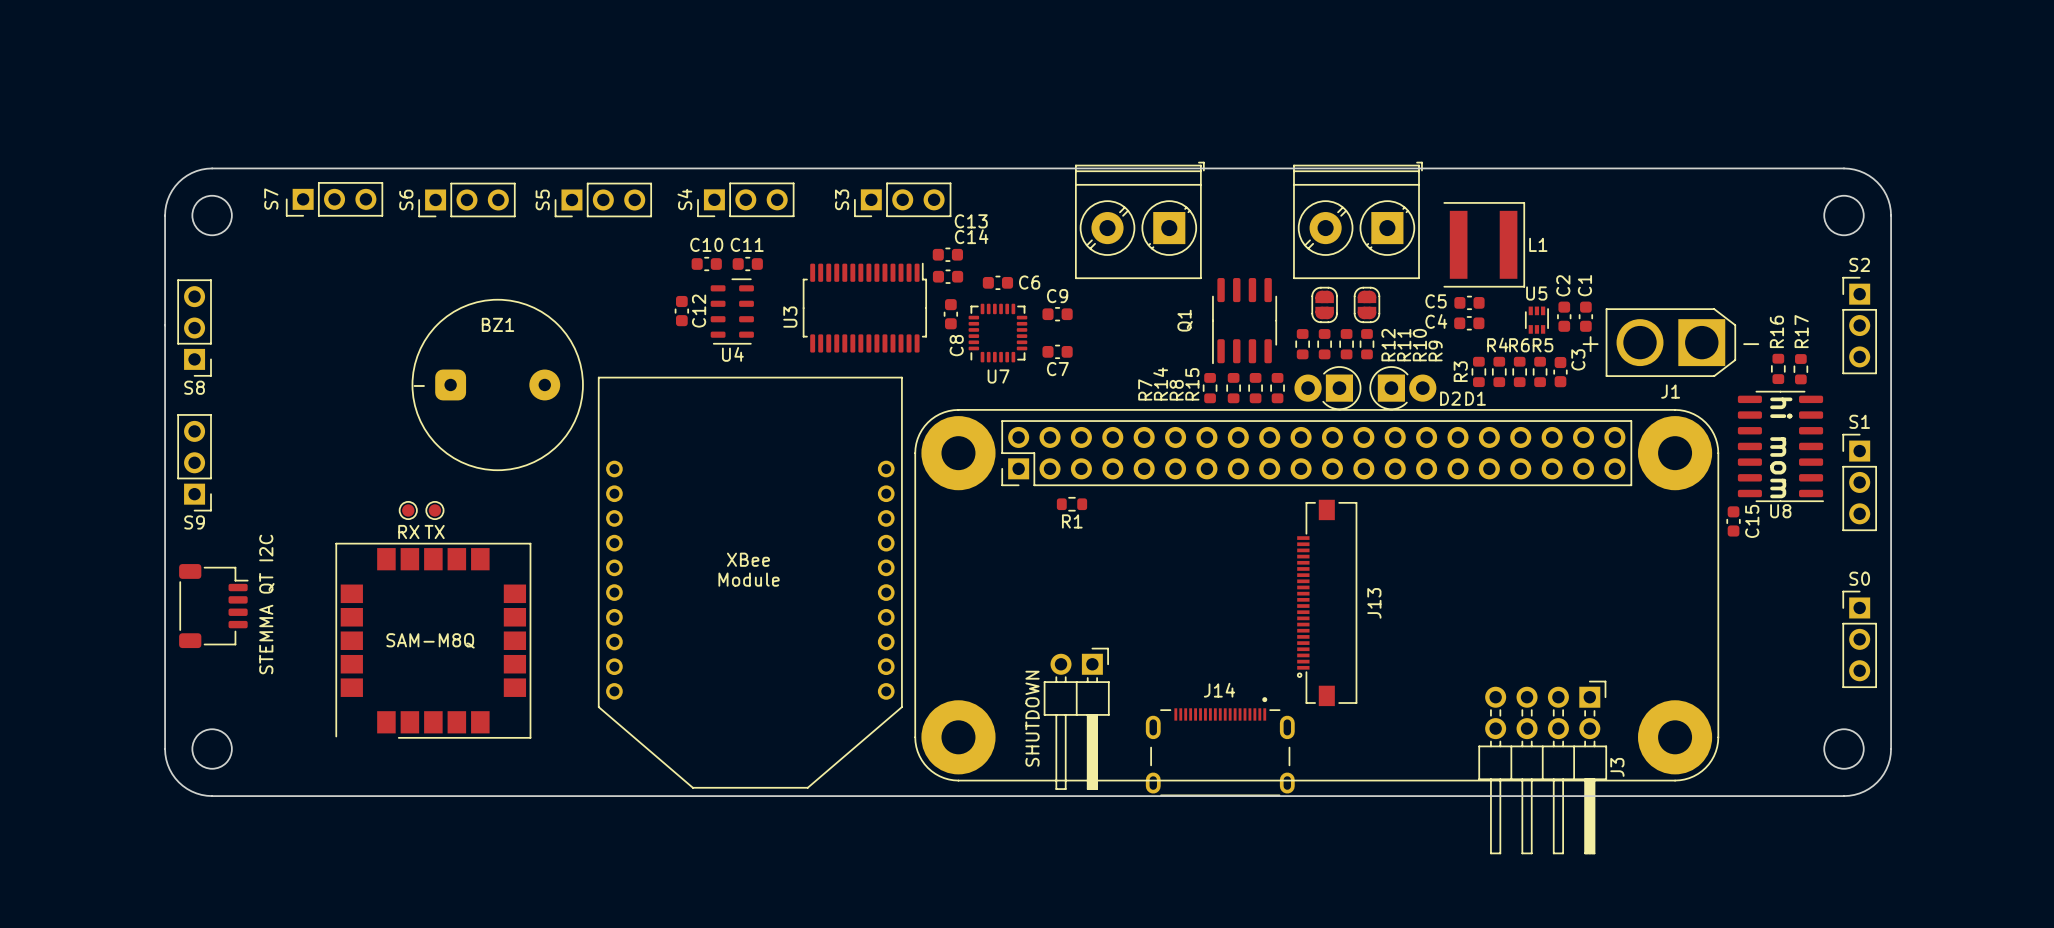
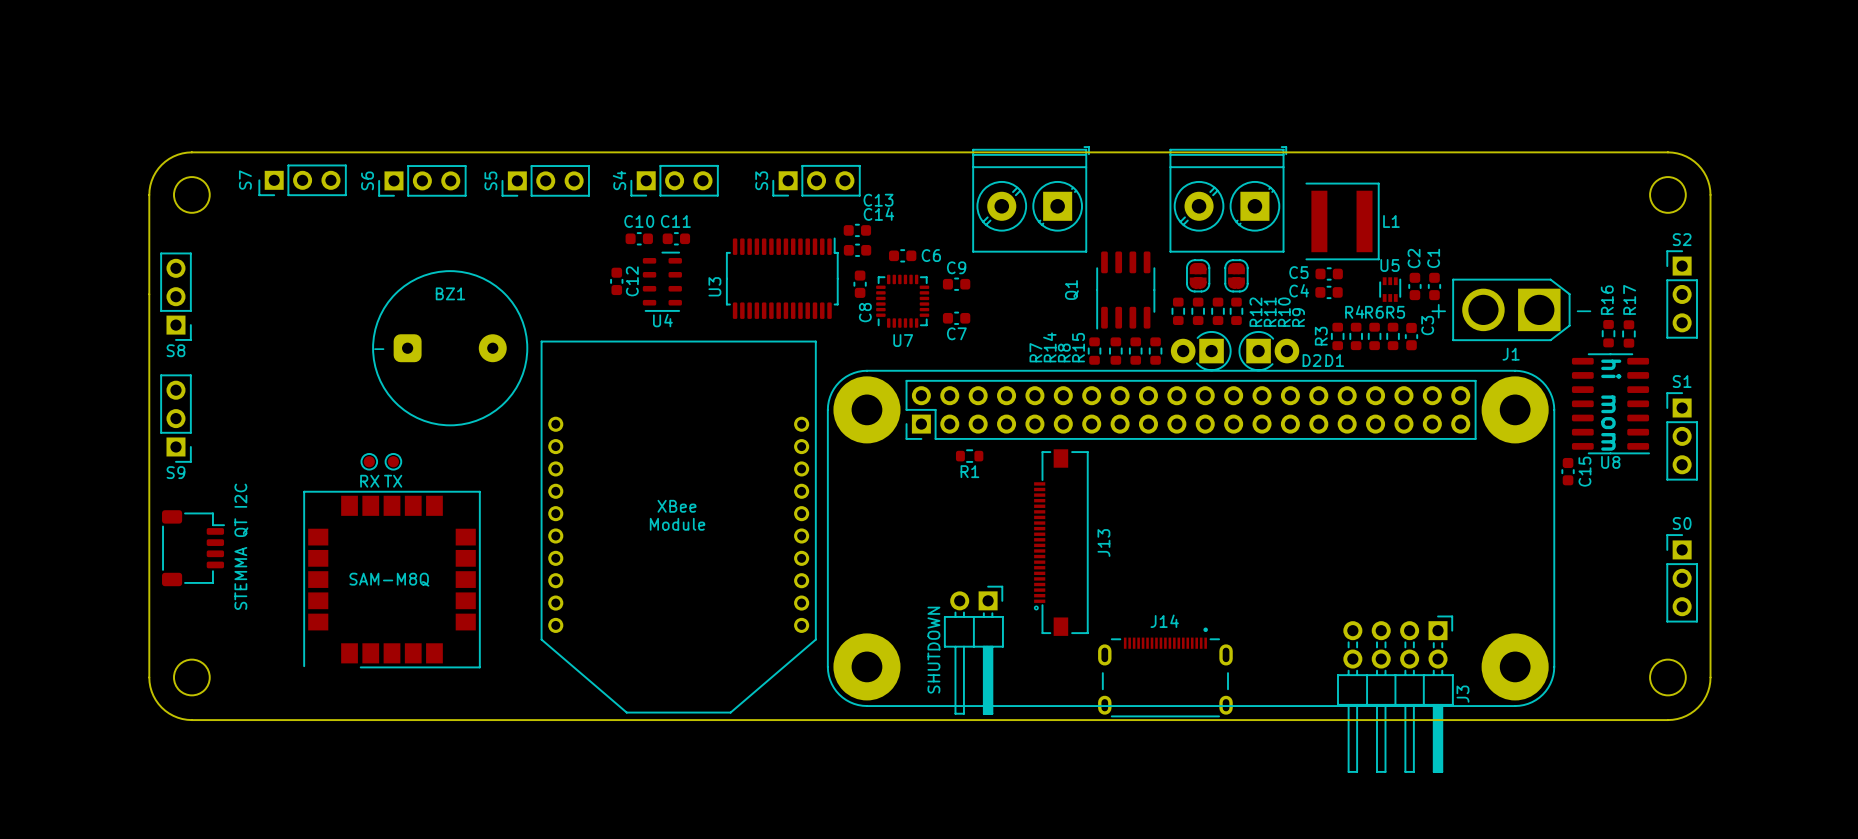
J13 position: (1327, 602) -> (1061, 542)
J14 position: (1220, 746) -> (1165, 672)

